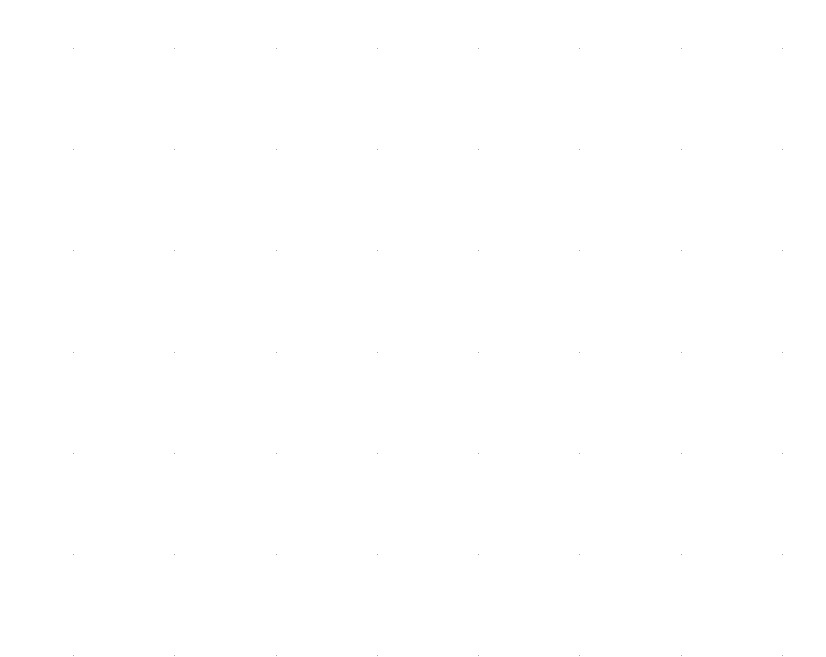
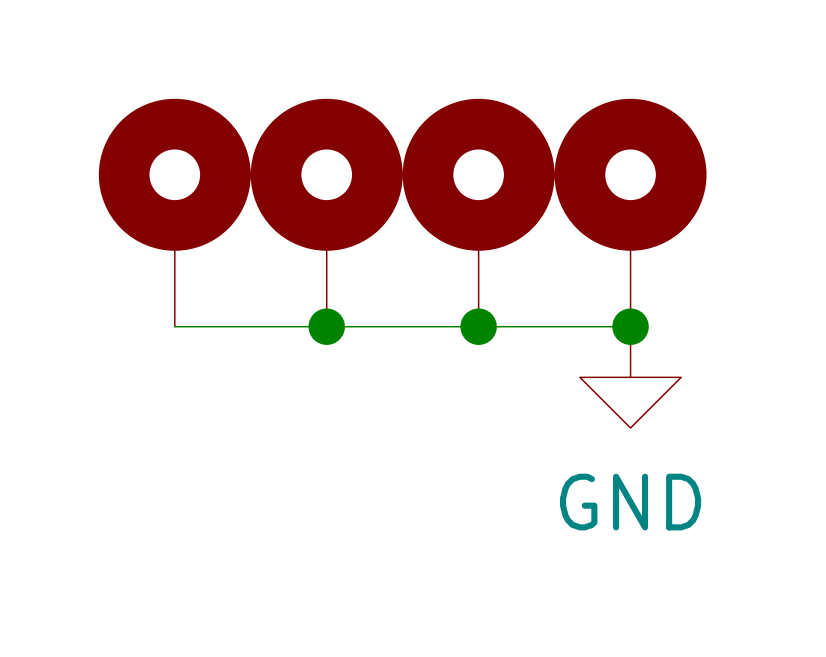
part: none -> (174, 212)
part: none -> (326, 212)
part: none -> (478, 212)
part: none -> (630, 212)
wire: none -> (174, 326) (630, 326)
junction: none -> (326, 326)
junction: none -> (478, 326)
junction: none -> (630, 326)
power symbol: none -> GND (630, 377)

